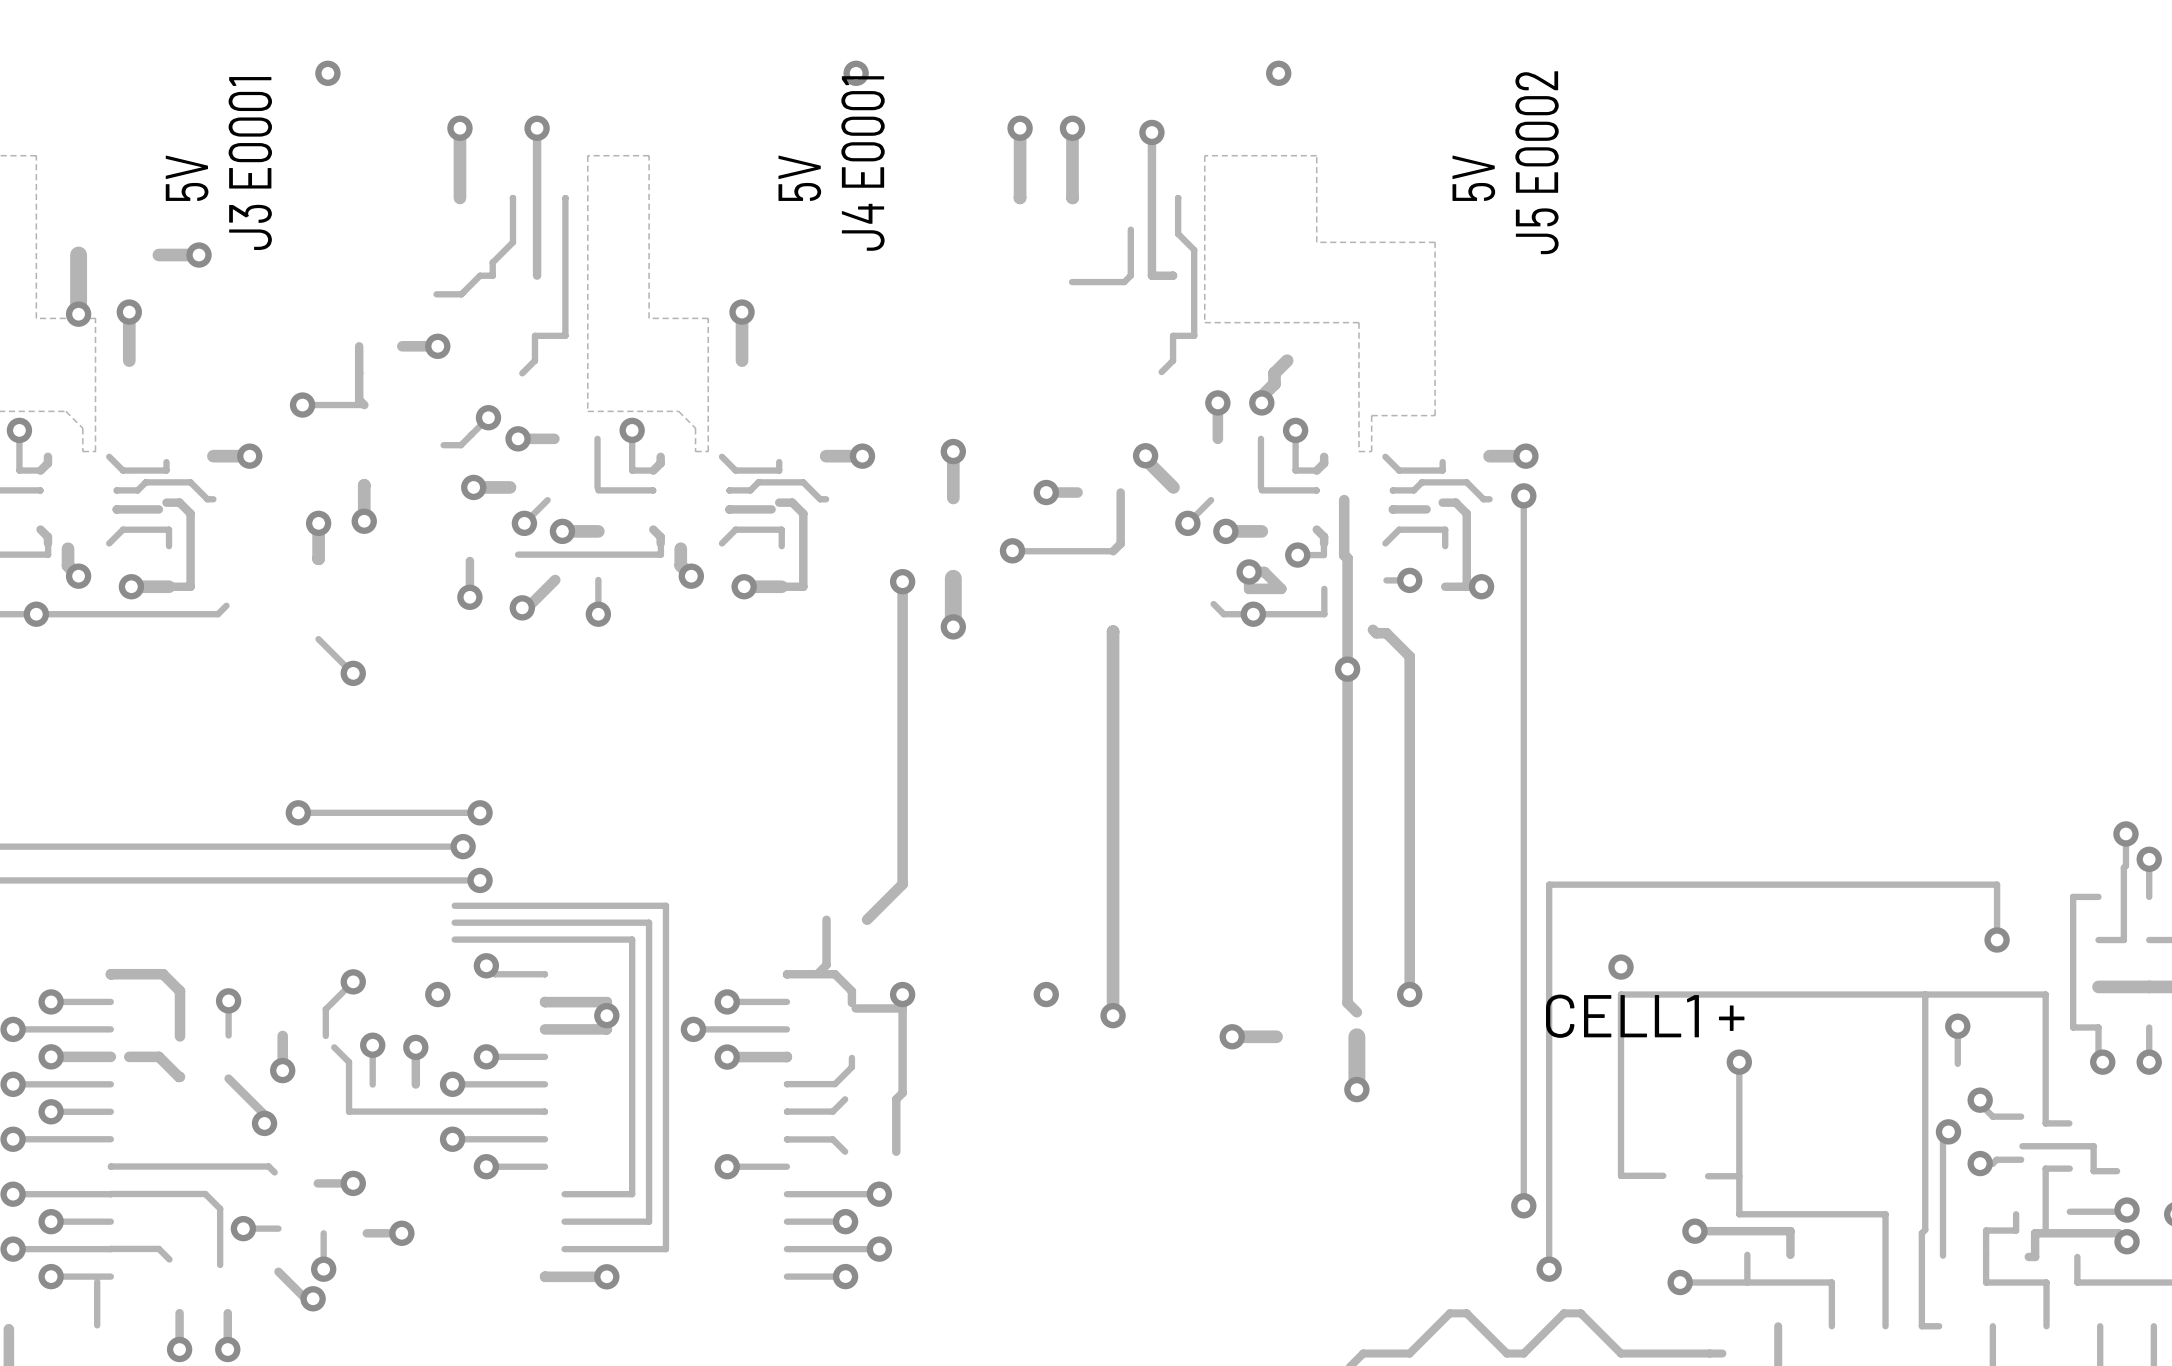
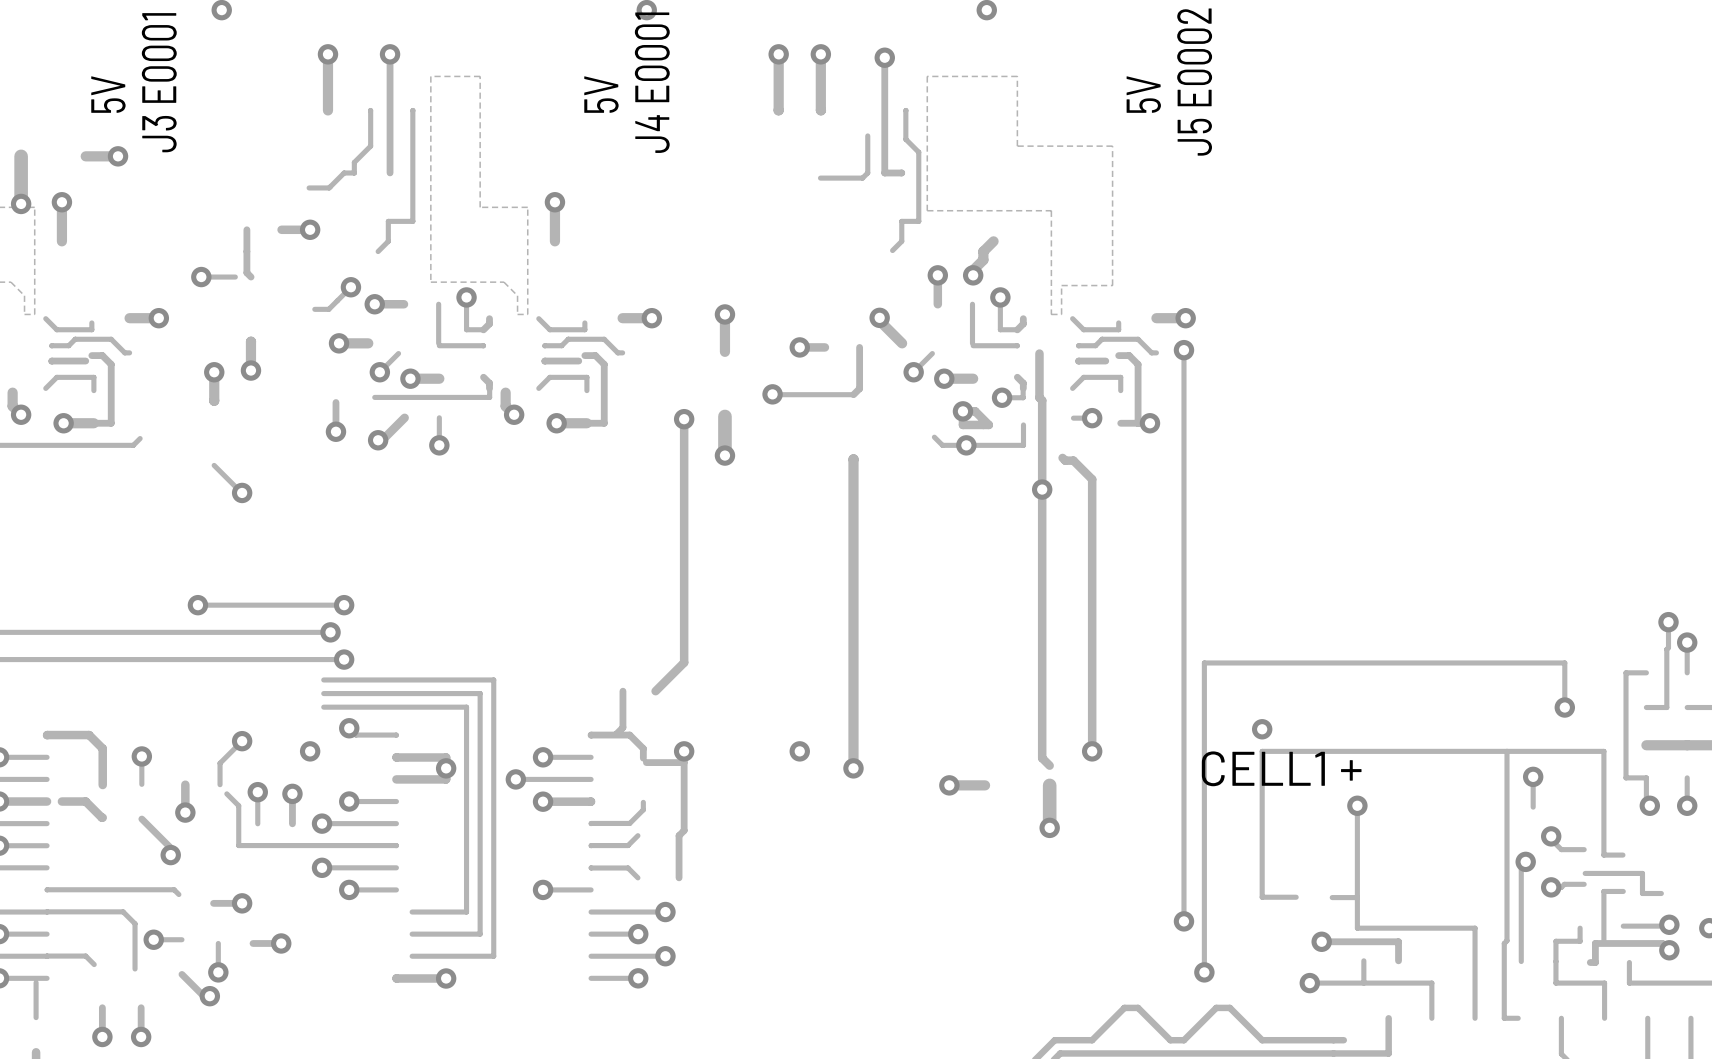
track: (344, 405) (364, 405) -> none

